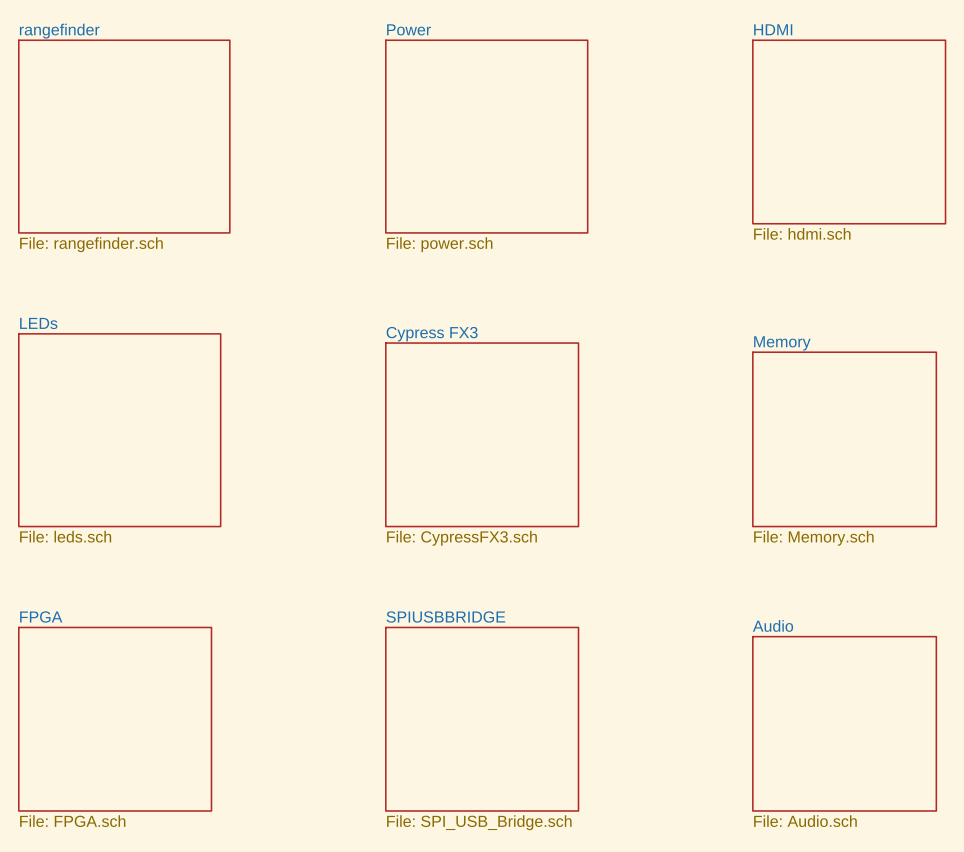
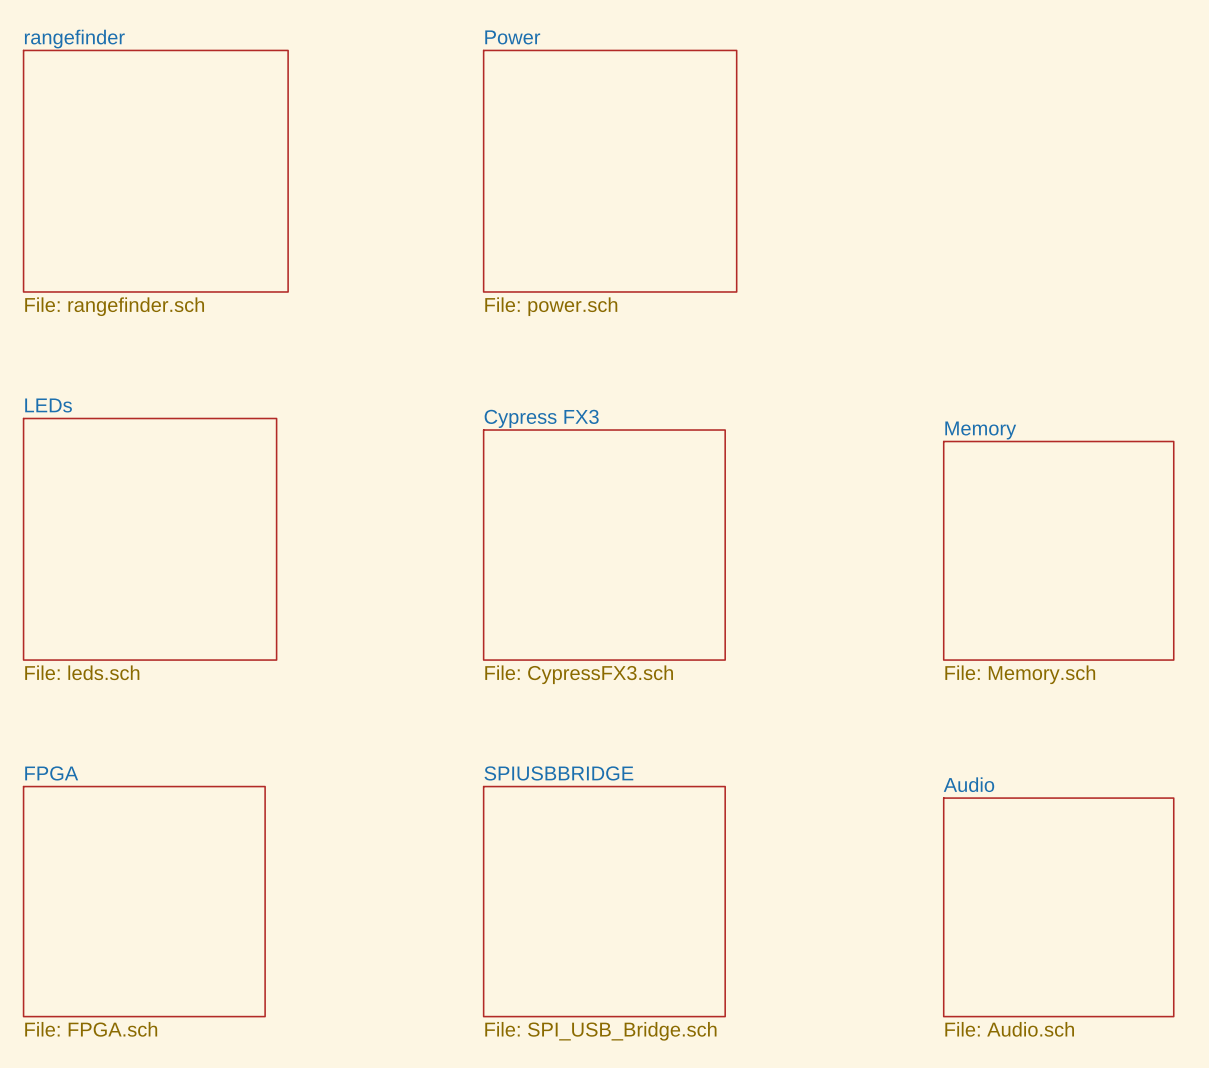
sheet HDMI: File: hdmi.sch (849, 132) -> none

